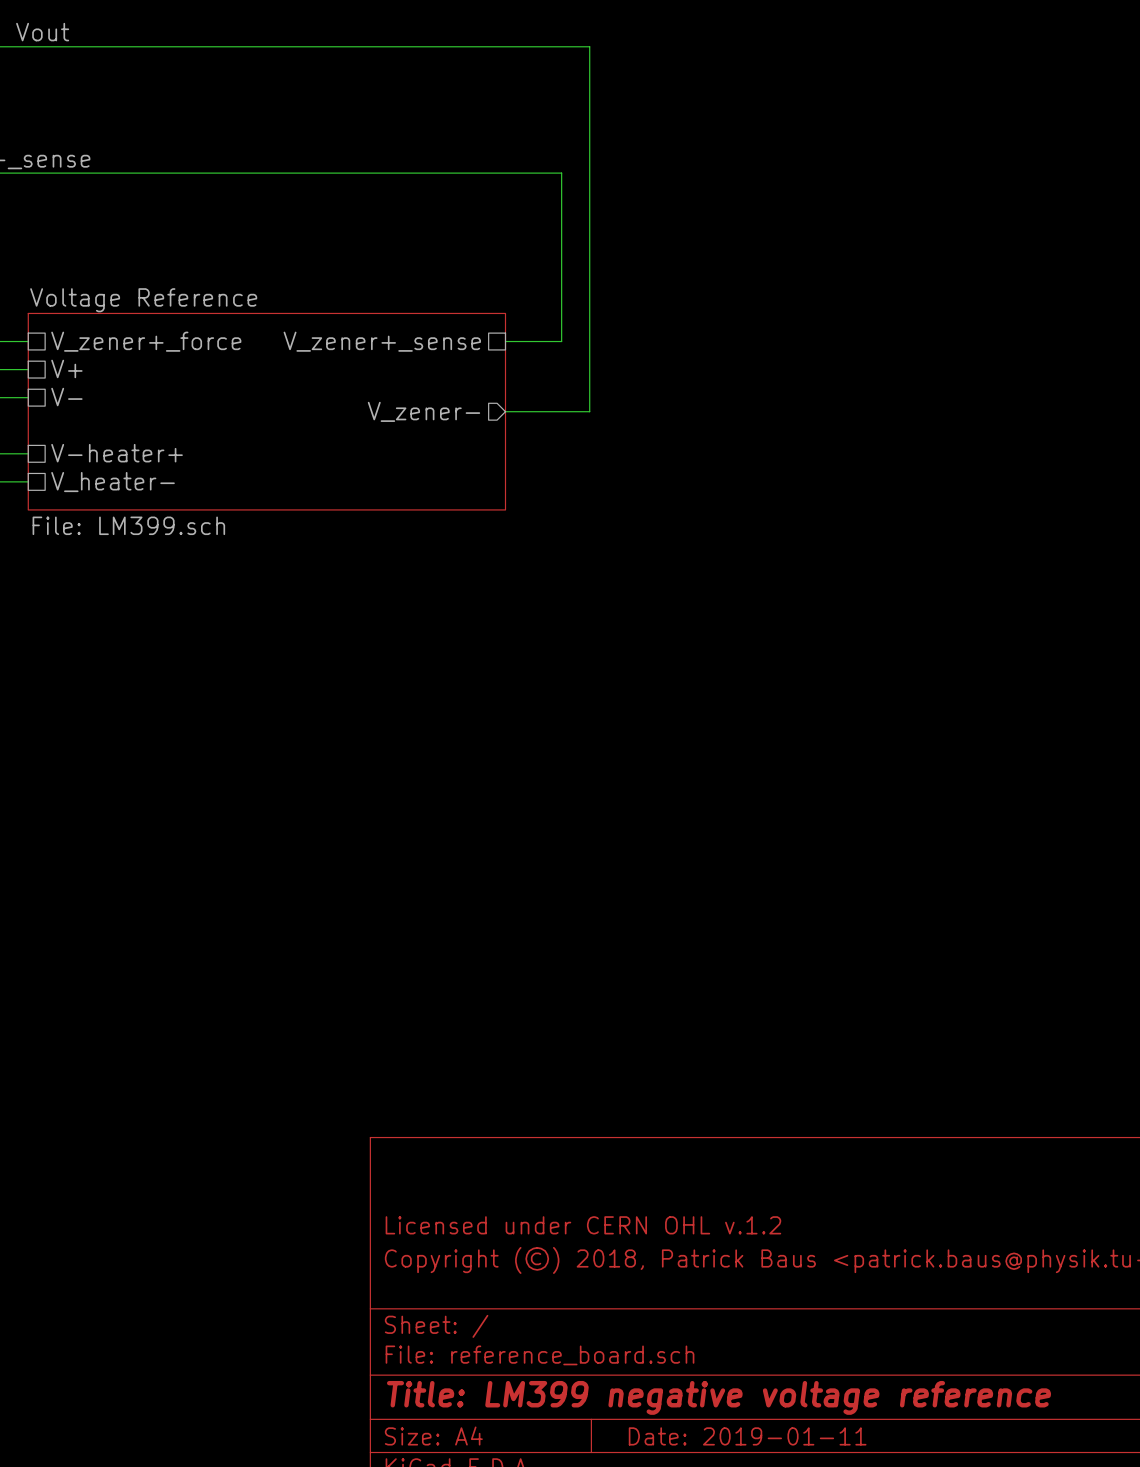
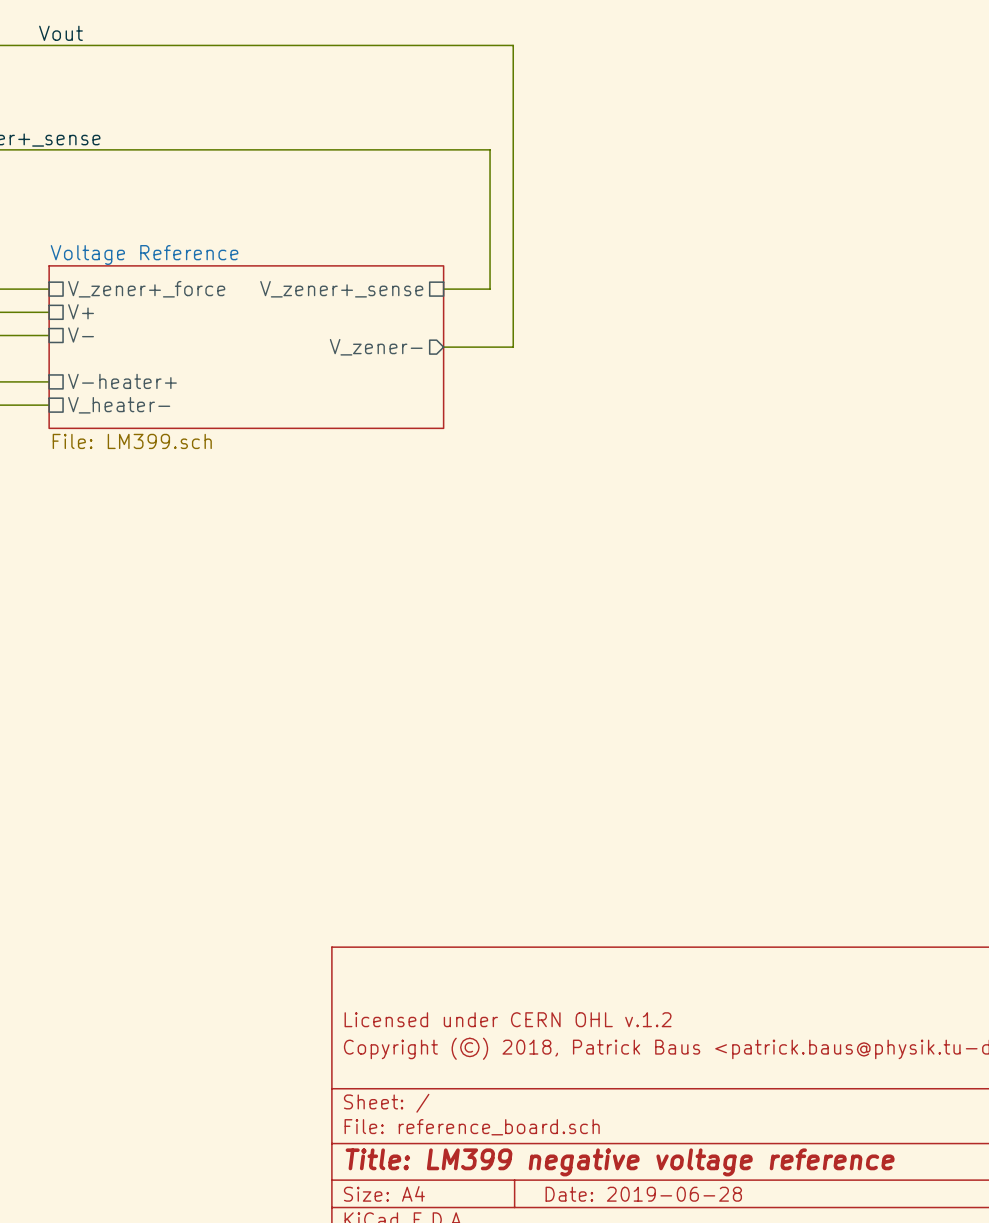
title block: Date: 2019-01-11 (747, 1436) -> Date: 2019-06-28 (643, 1194)

